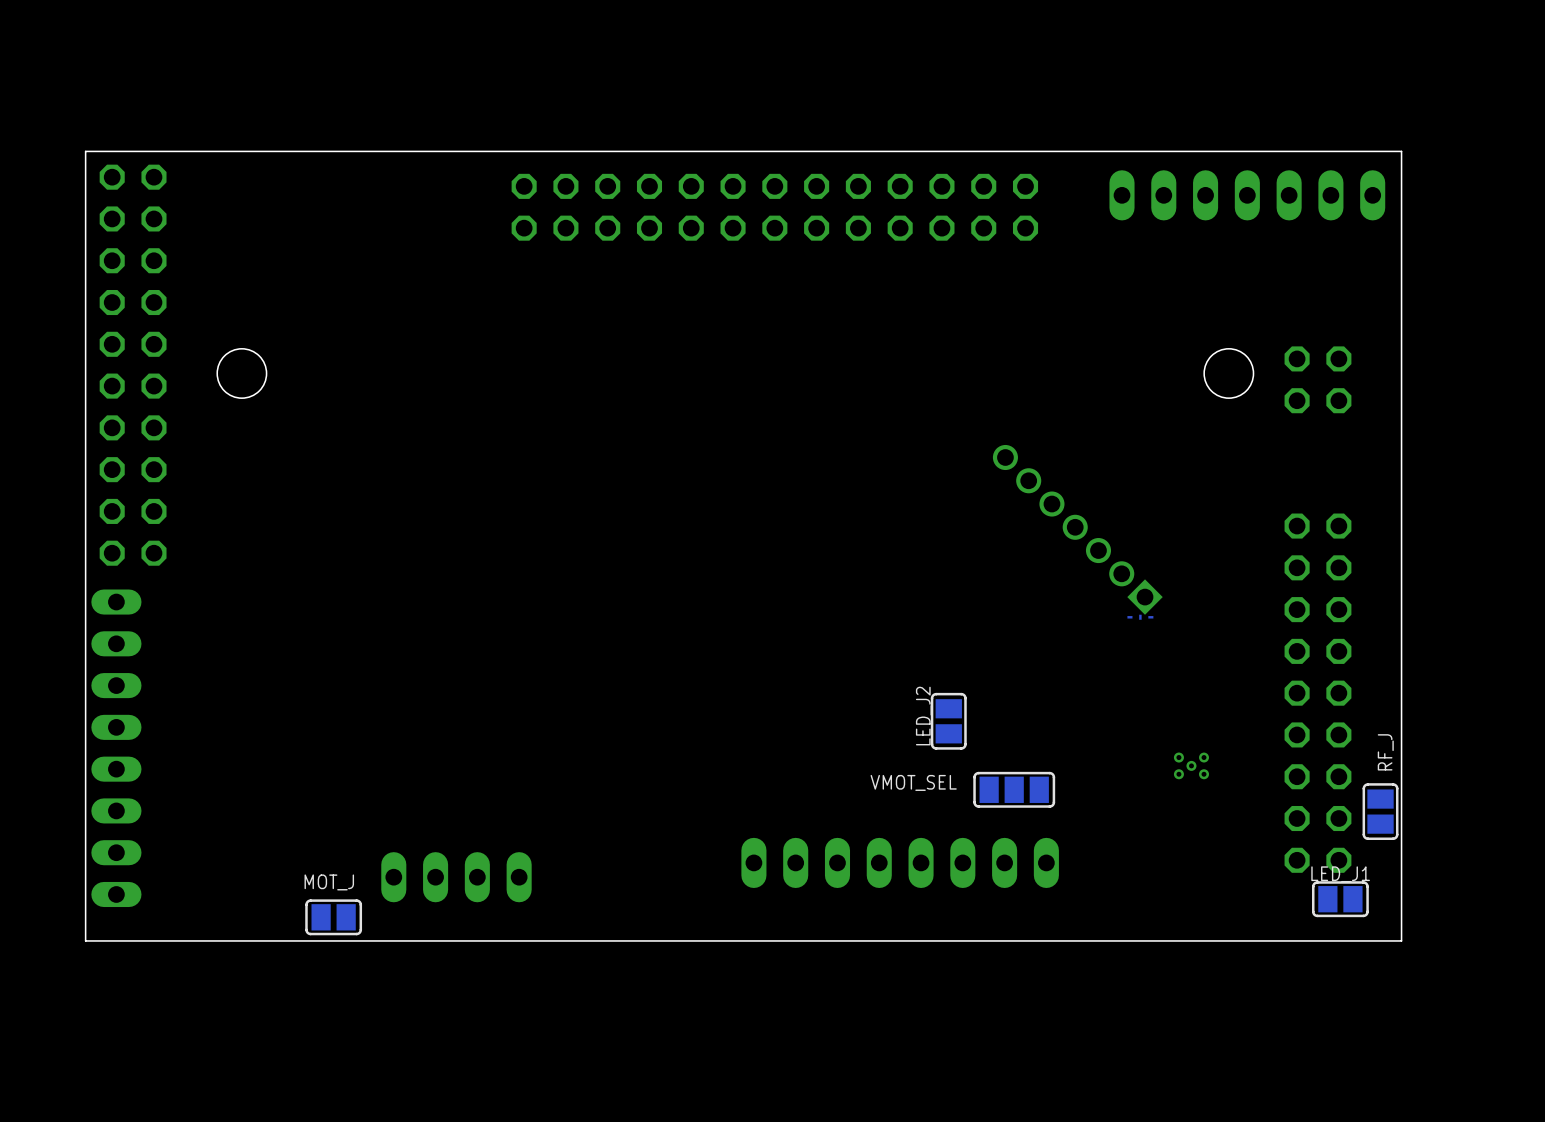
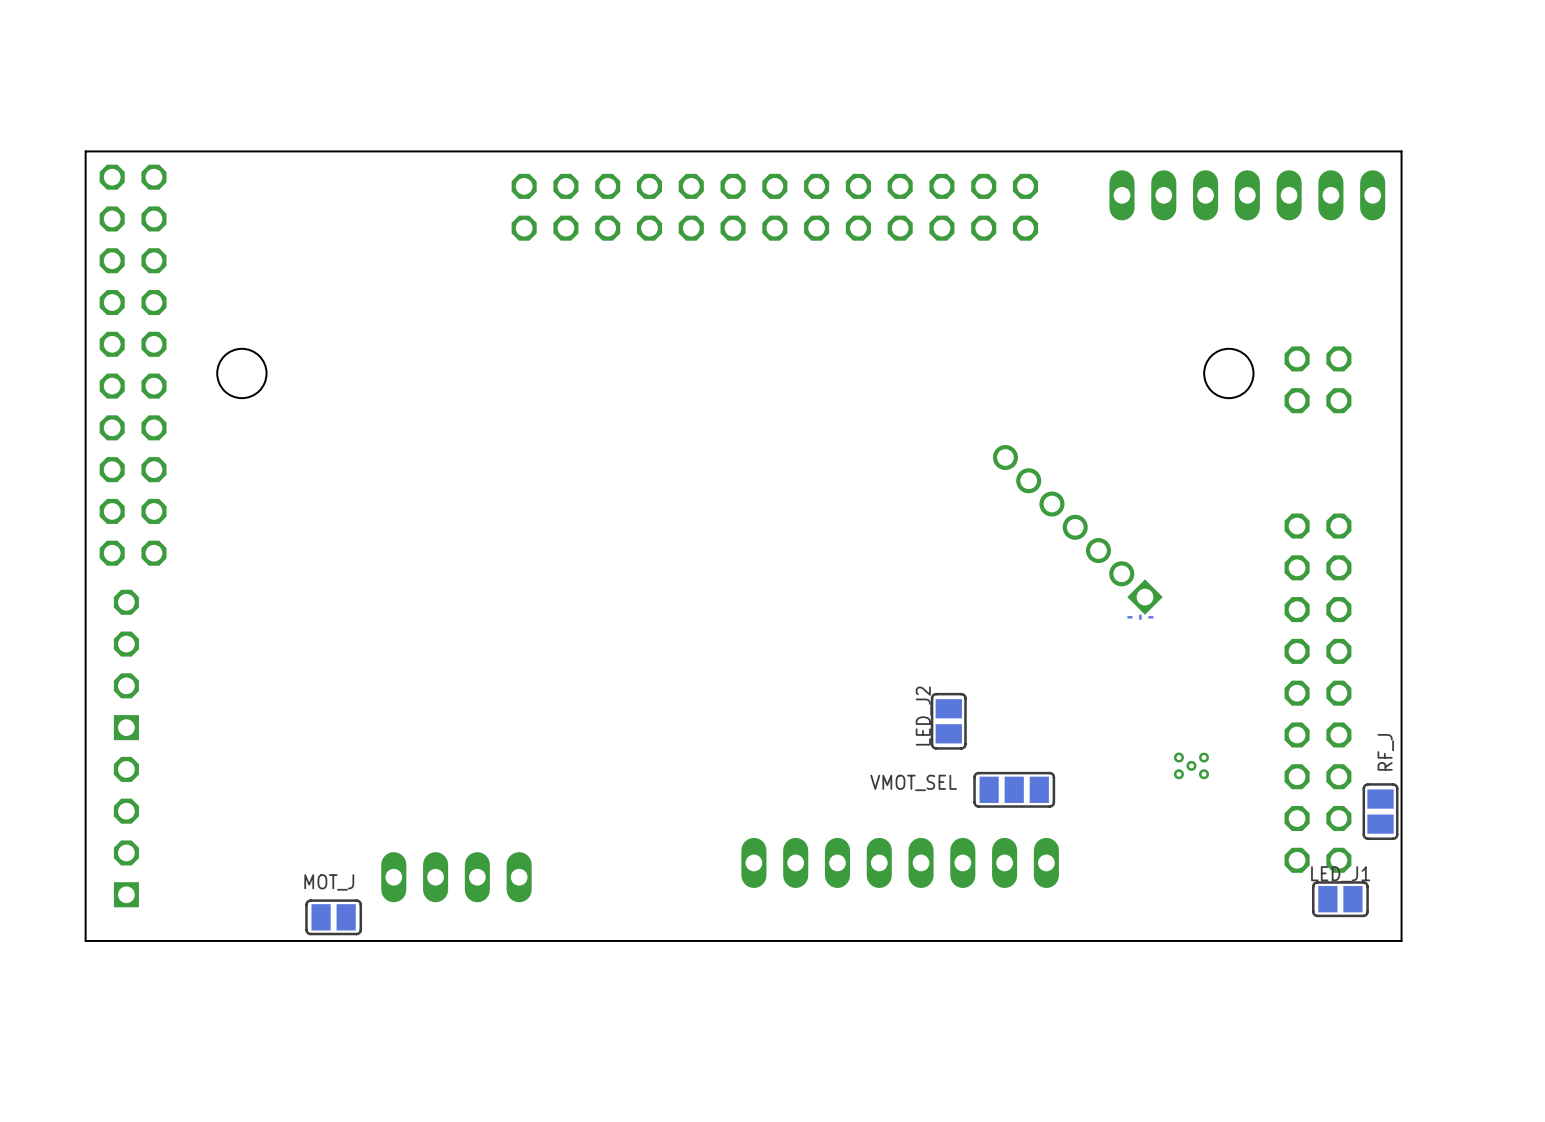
part footprint: [91, 589, 142, 740] -> [113, 589, 139, 741]
part footprint: [91, 756, 142, 908] -> [113, 756, 139, 908]

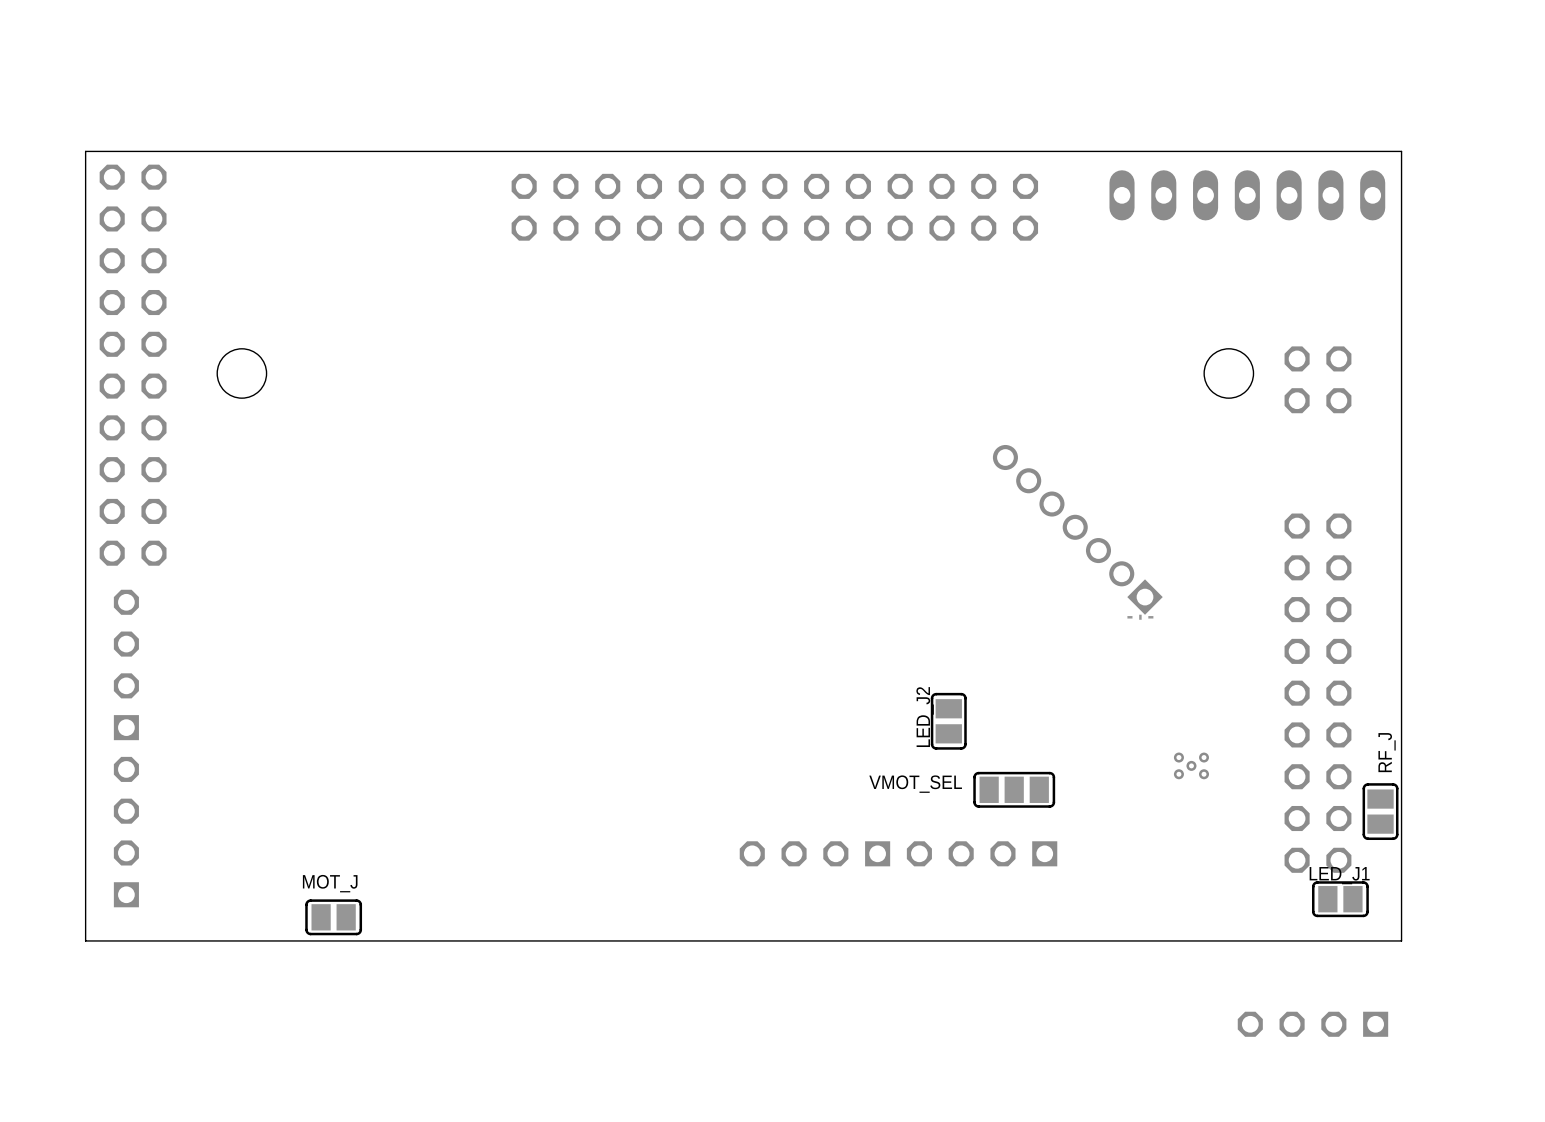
part footprint: [741, 837, 892, 889] -> [739, 841, 891, 867]
part footprint: [908, 837, 1059, 889] -> [906, 841, 1058, 867]
part: (456, 877) -> none
part: none -> (1312, 1024)

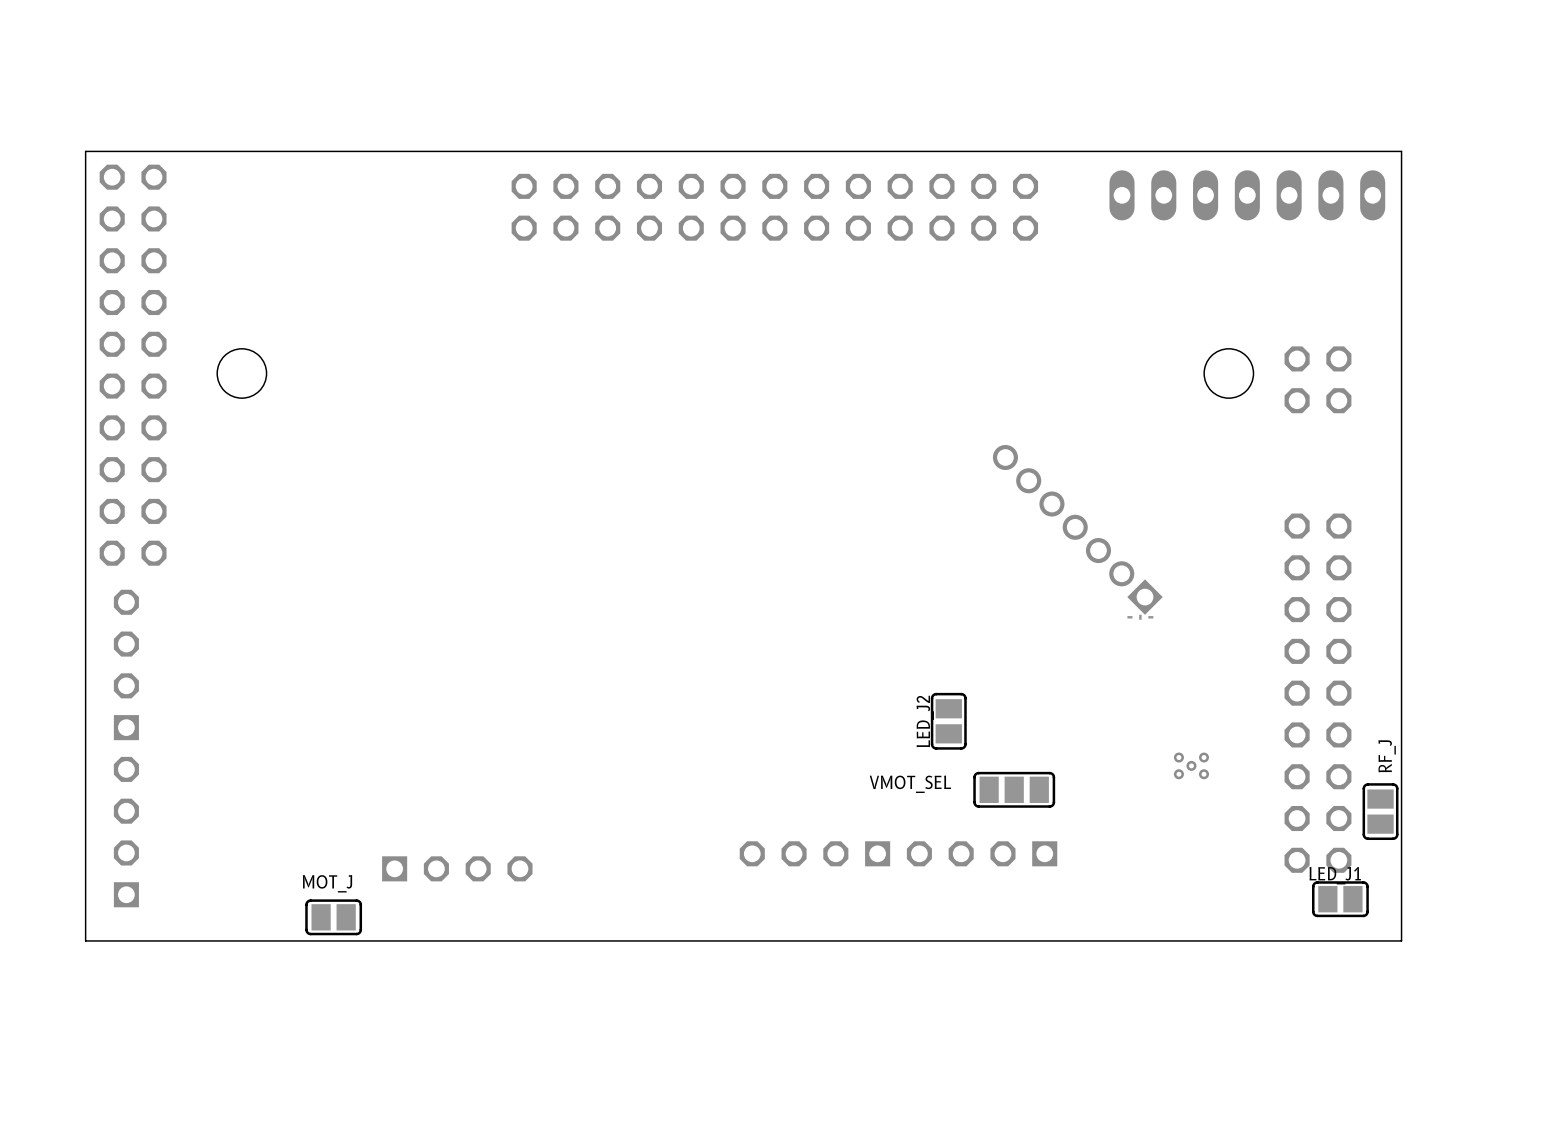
part: none -> (457, 868)
part: (1312, 1024) -> none

